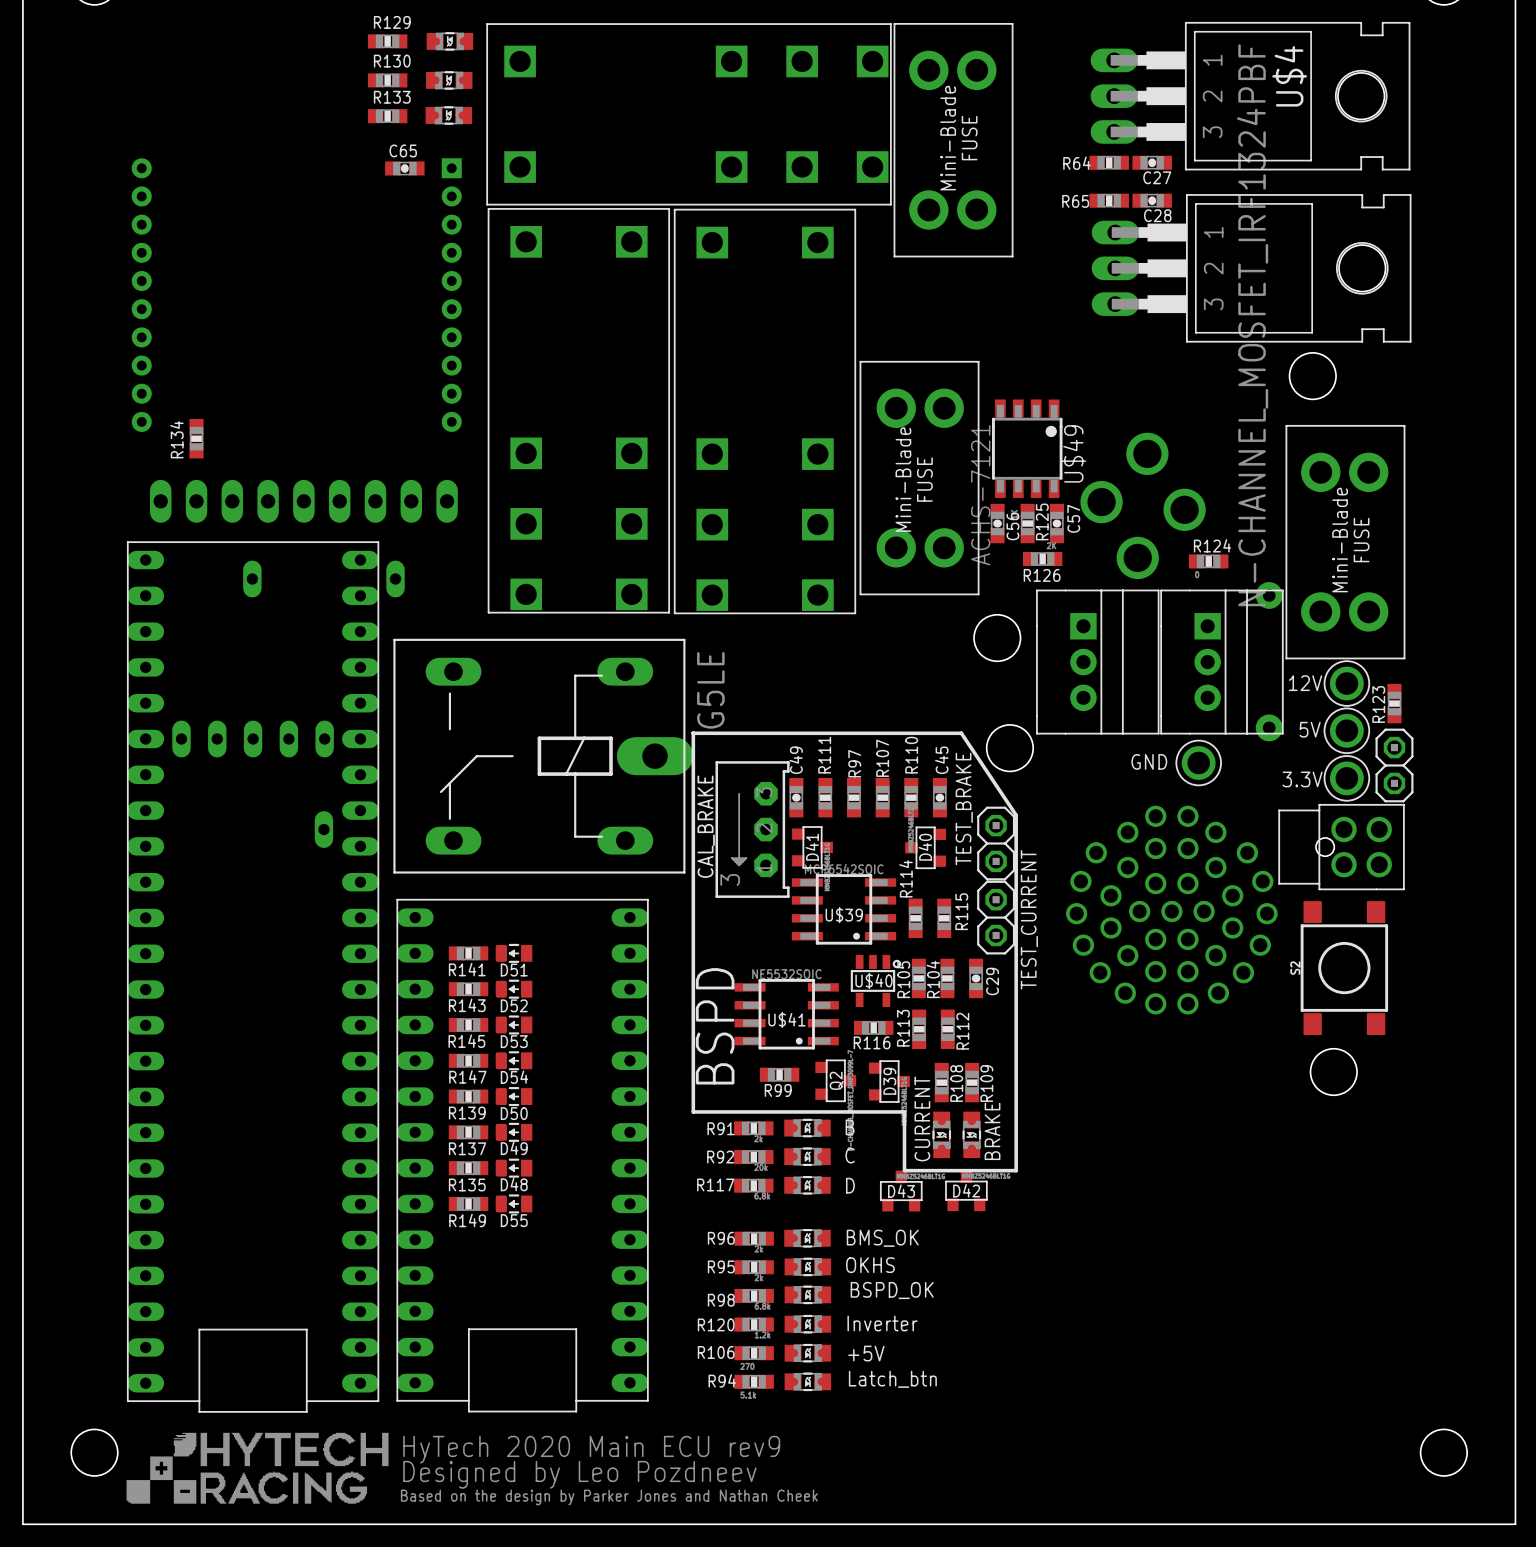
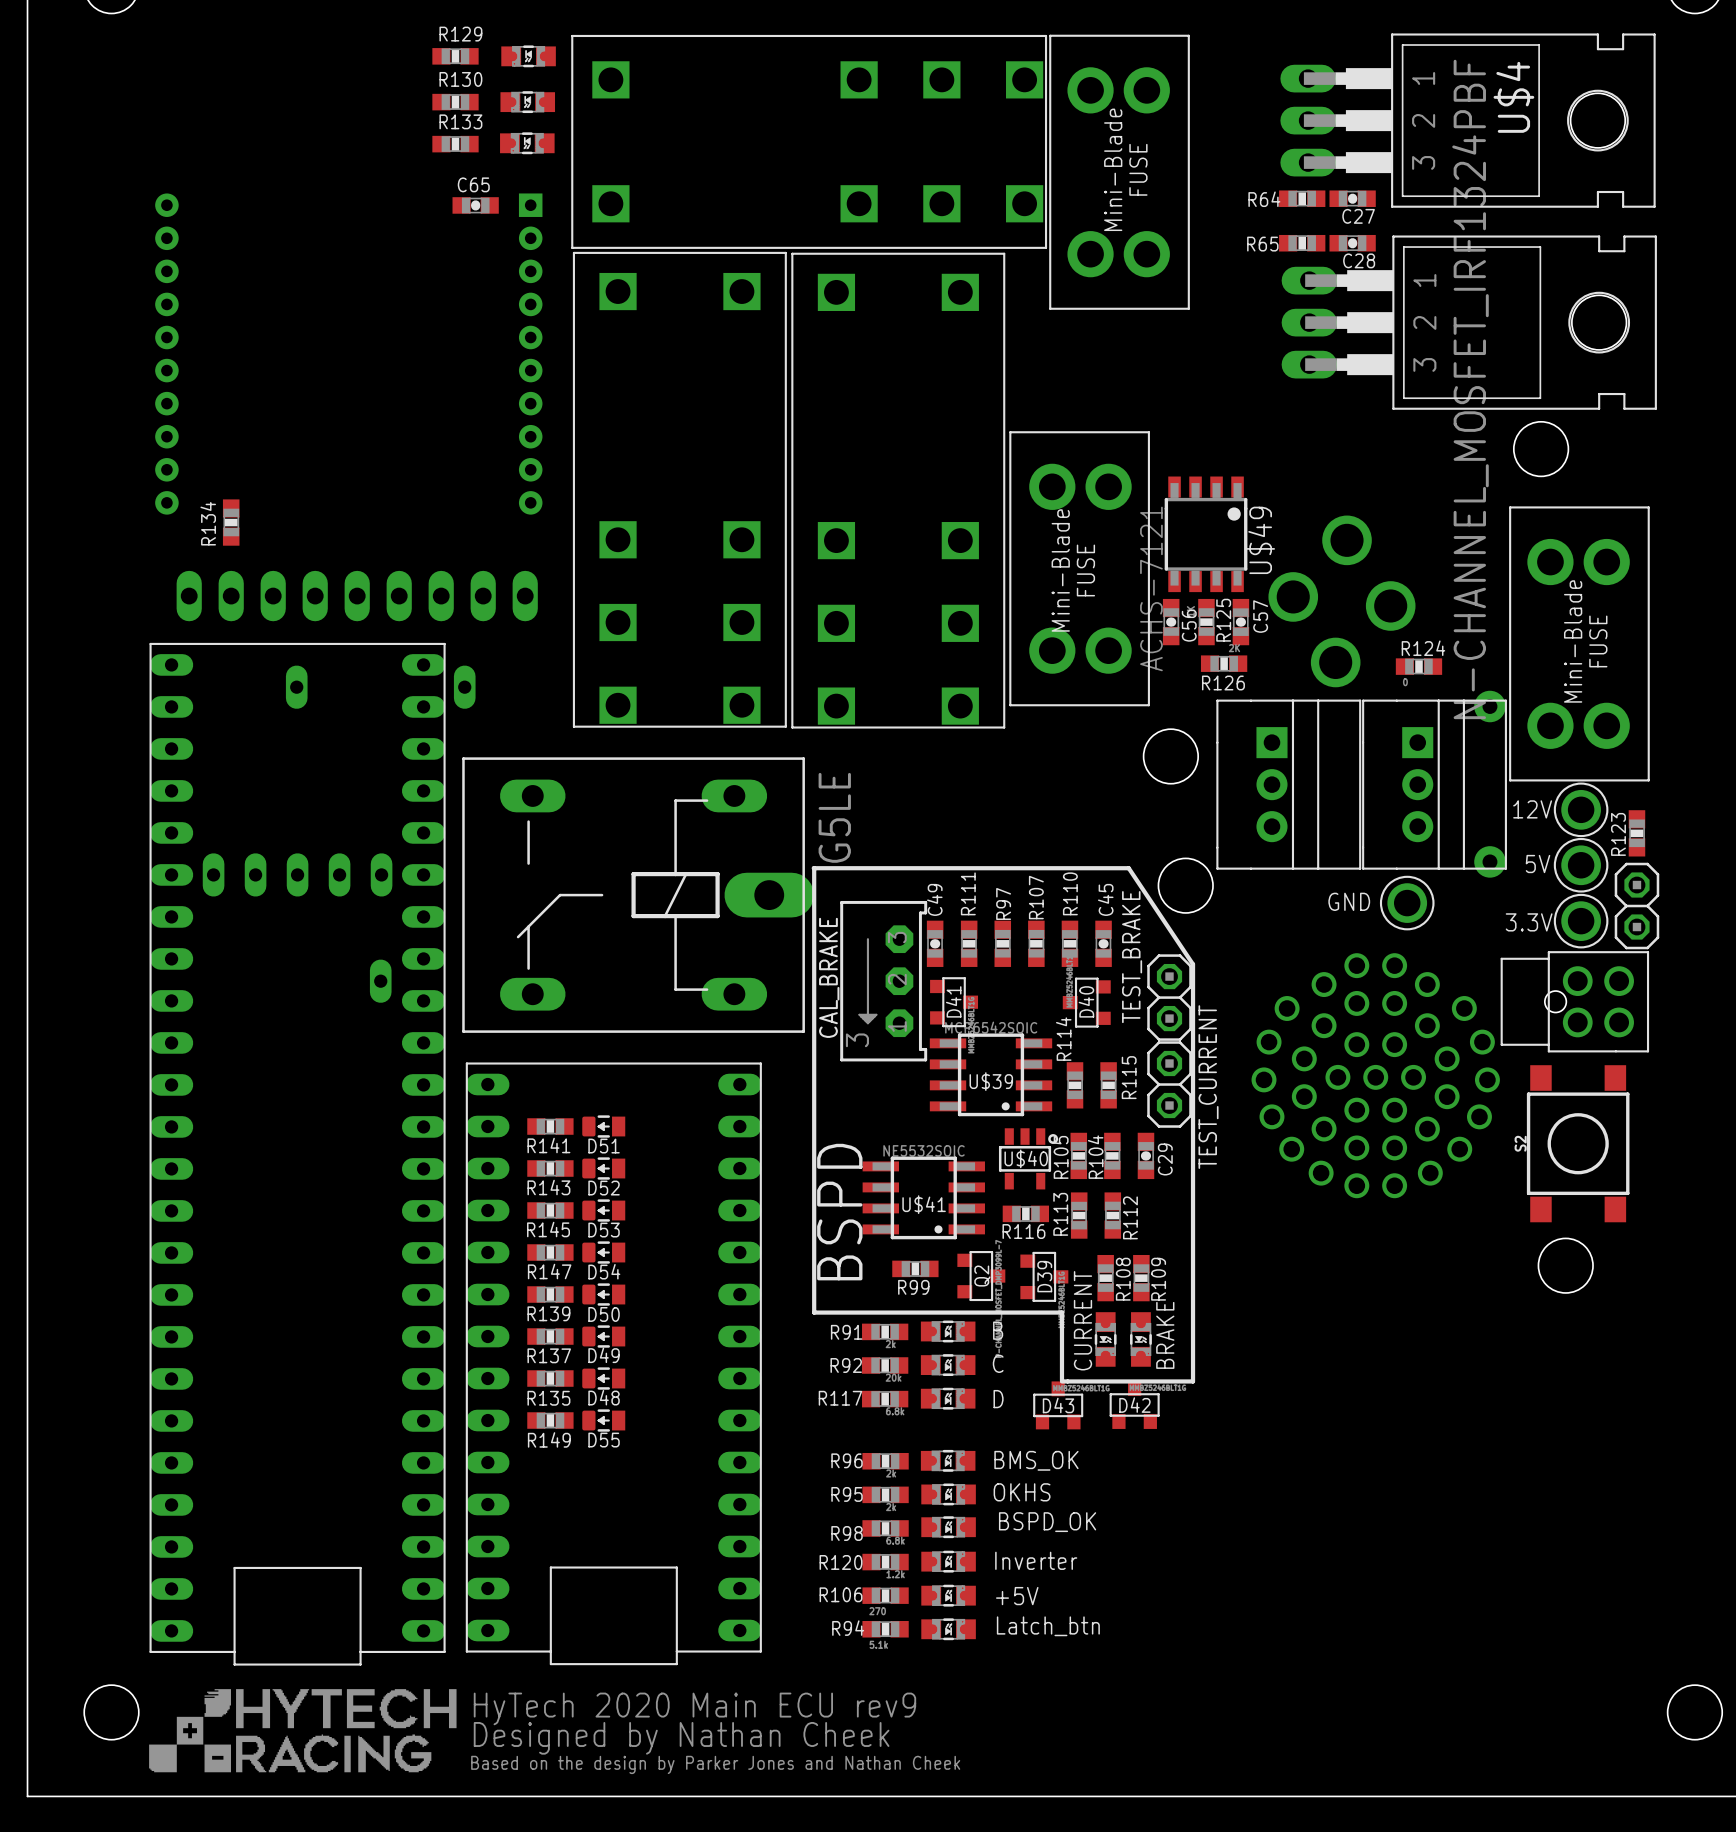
text: Designed by Leo Pozdneev (579, 1474) -> Designed by Nathan Cheek (681, 1738)

